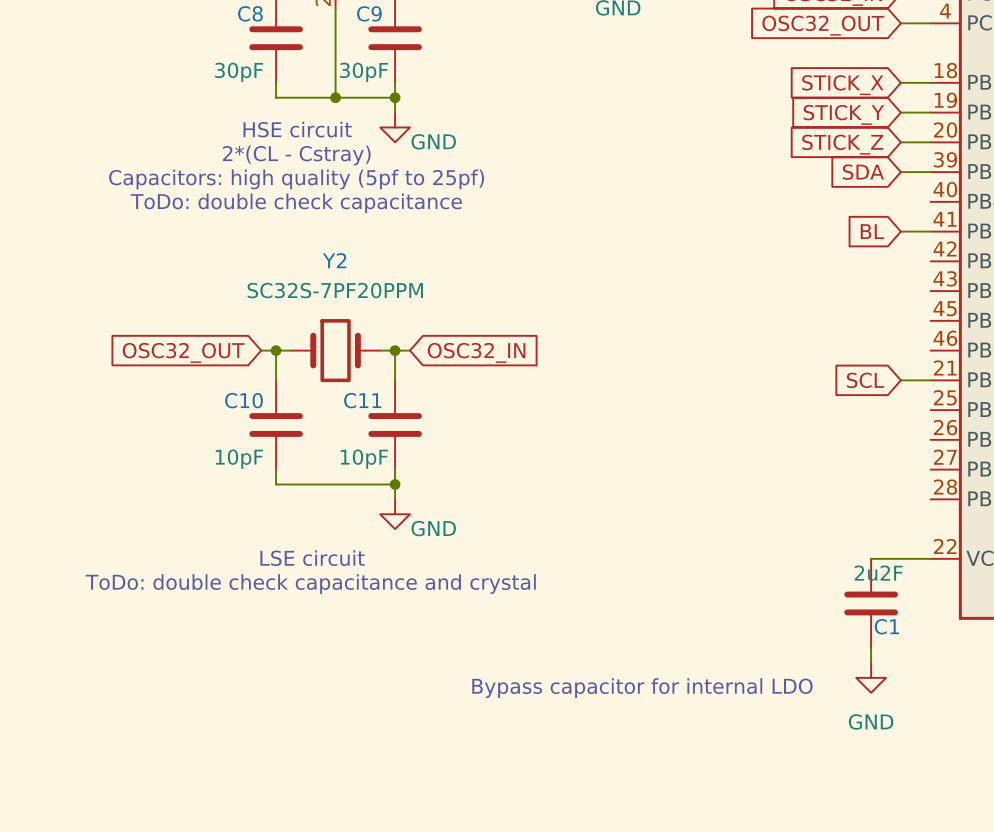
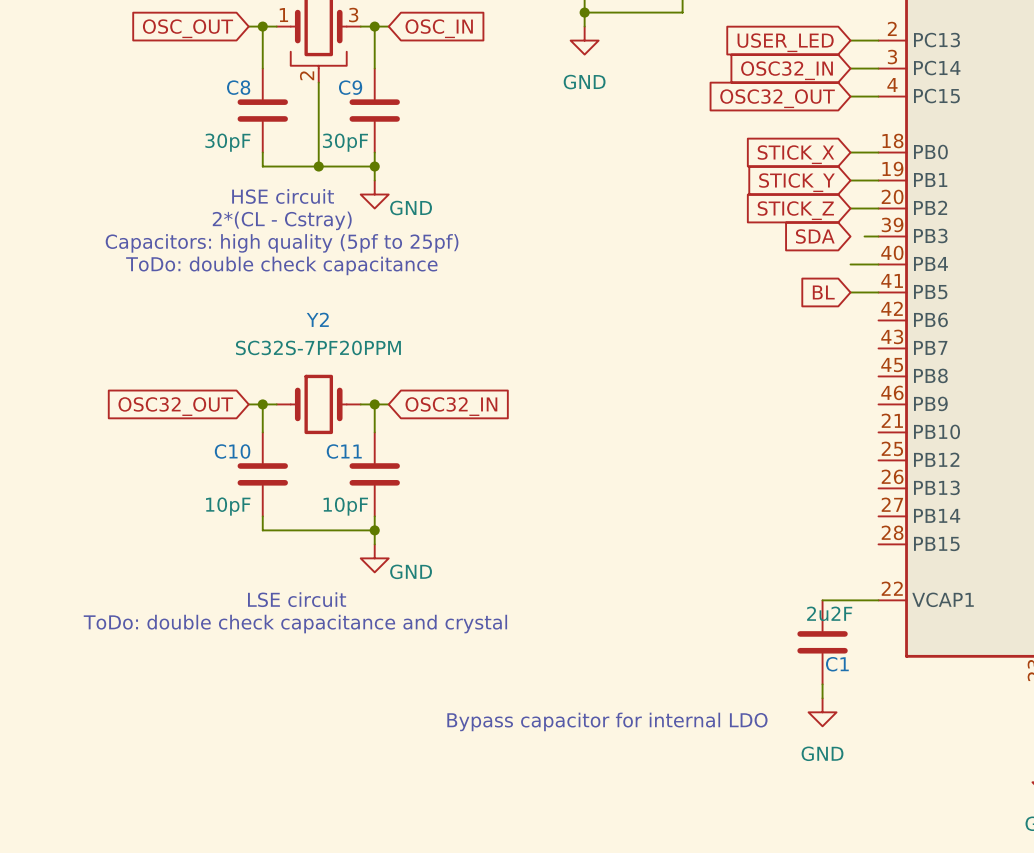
wire: (900, 172) (915, 172) -> none
global label: SCL (865, 380) -> none
wire: (900, 380) (930, 380) -> (850, 264) (878, 264)

